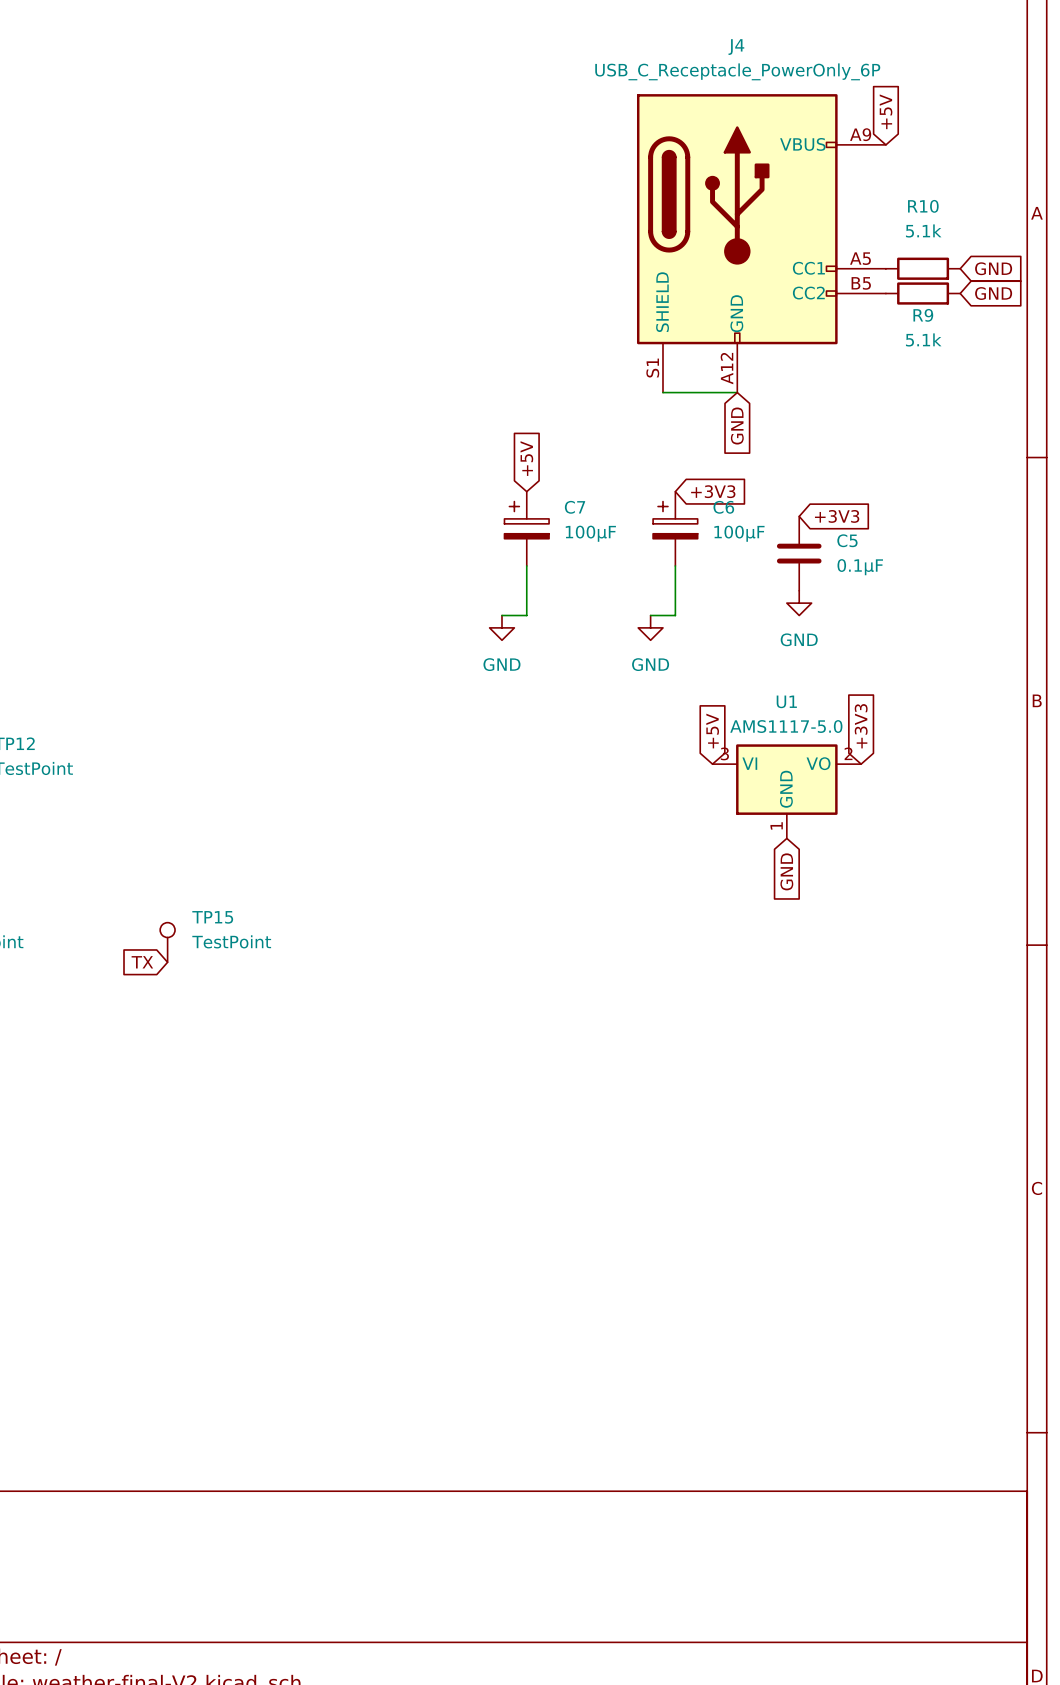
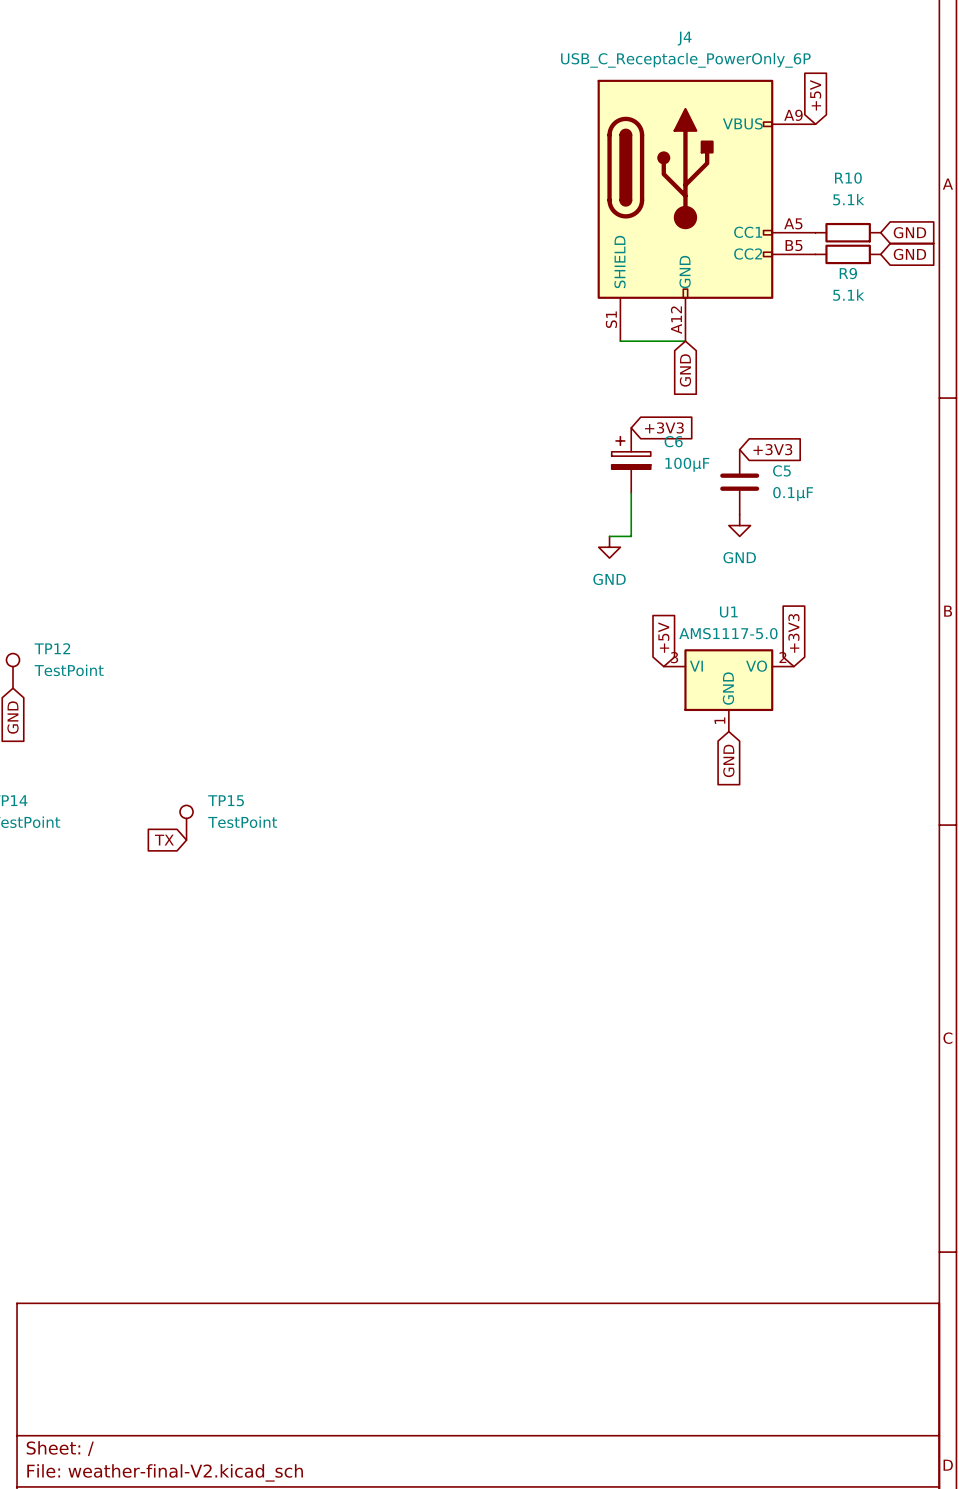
global label: +5V (526, 458) -> none
C7: 100μF (526, 528) -> none
wire: (526, 565) (526, 615) (501, 615) -> none
power symbol: GND (501, 627) -> none

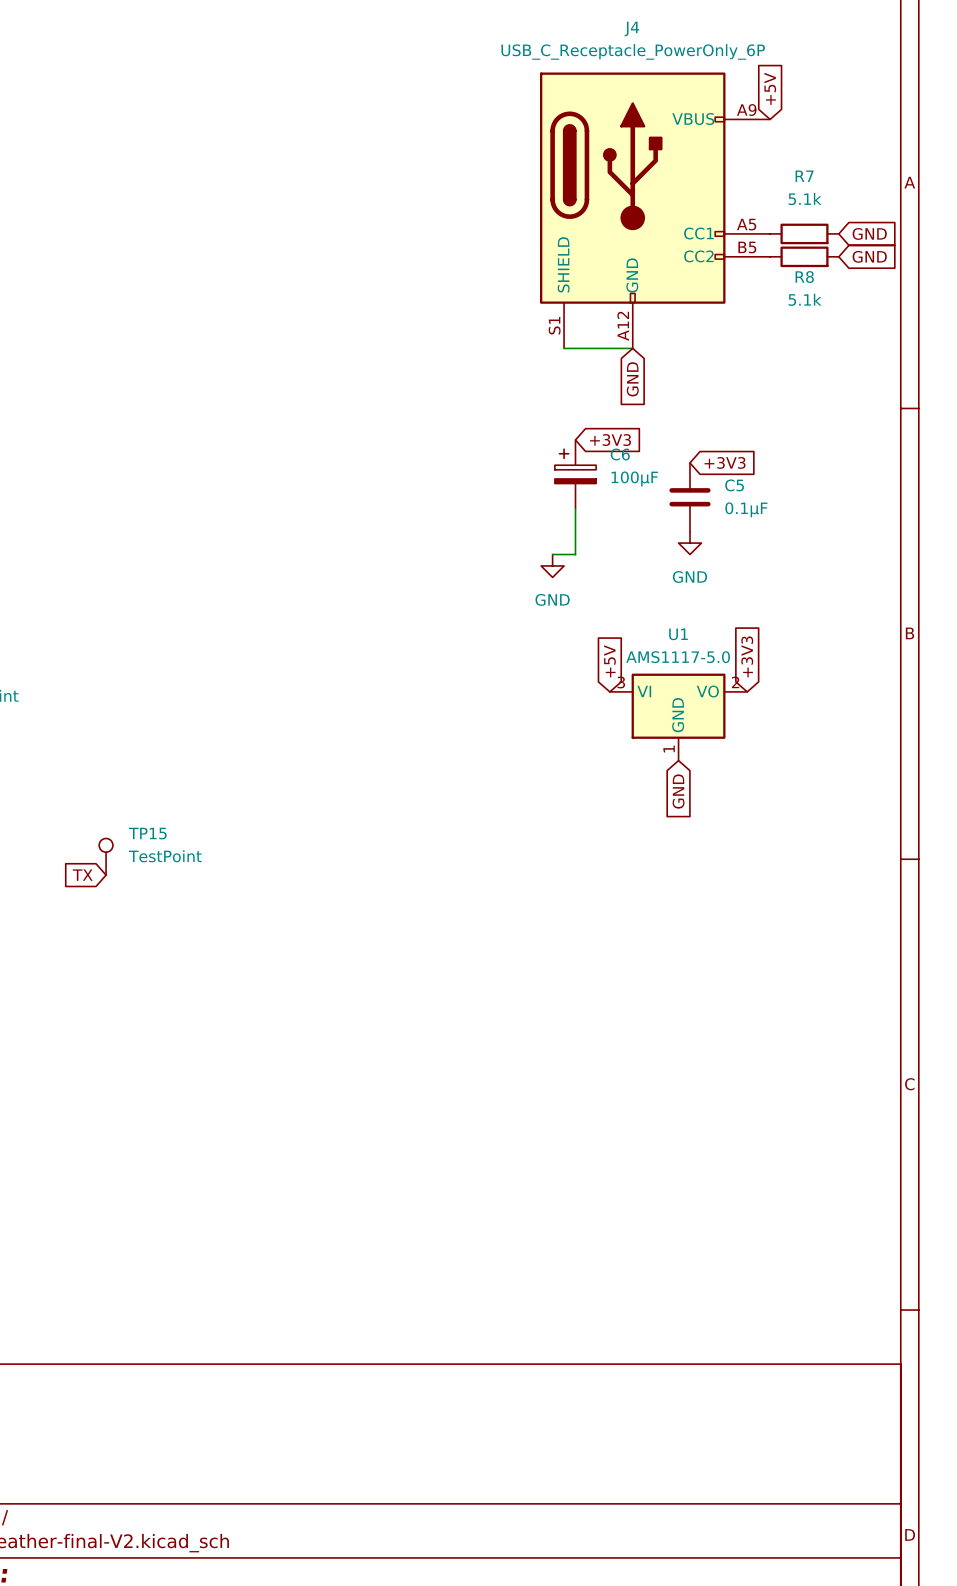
R10 name: R10 (848, 178) -> R7 (804, 176)
R9 name: R9 (848, 273) -> R8 (804, 277)

